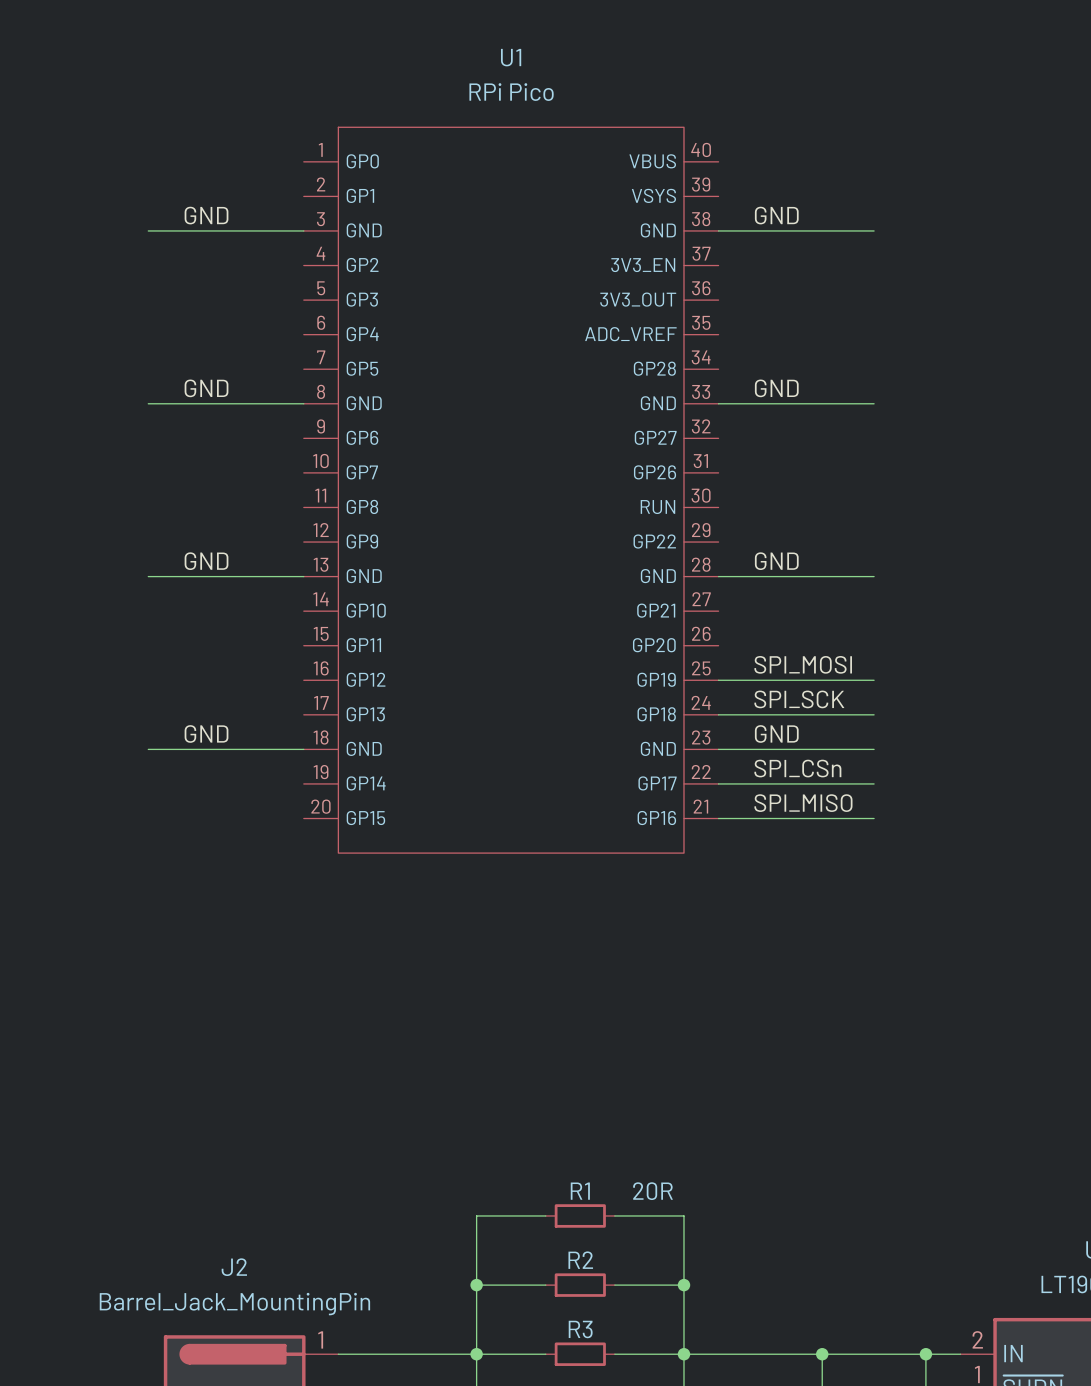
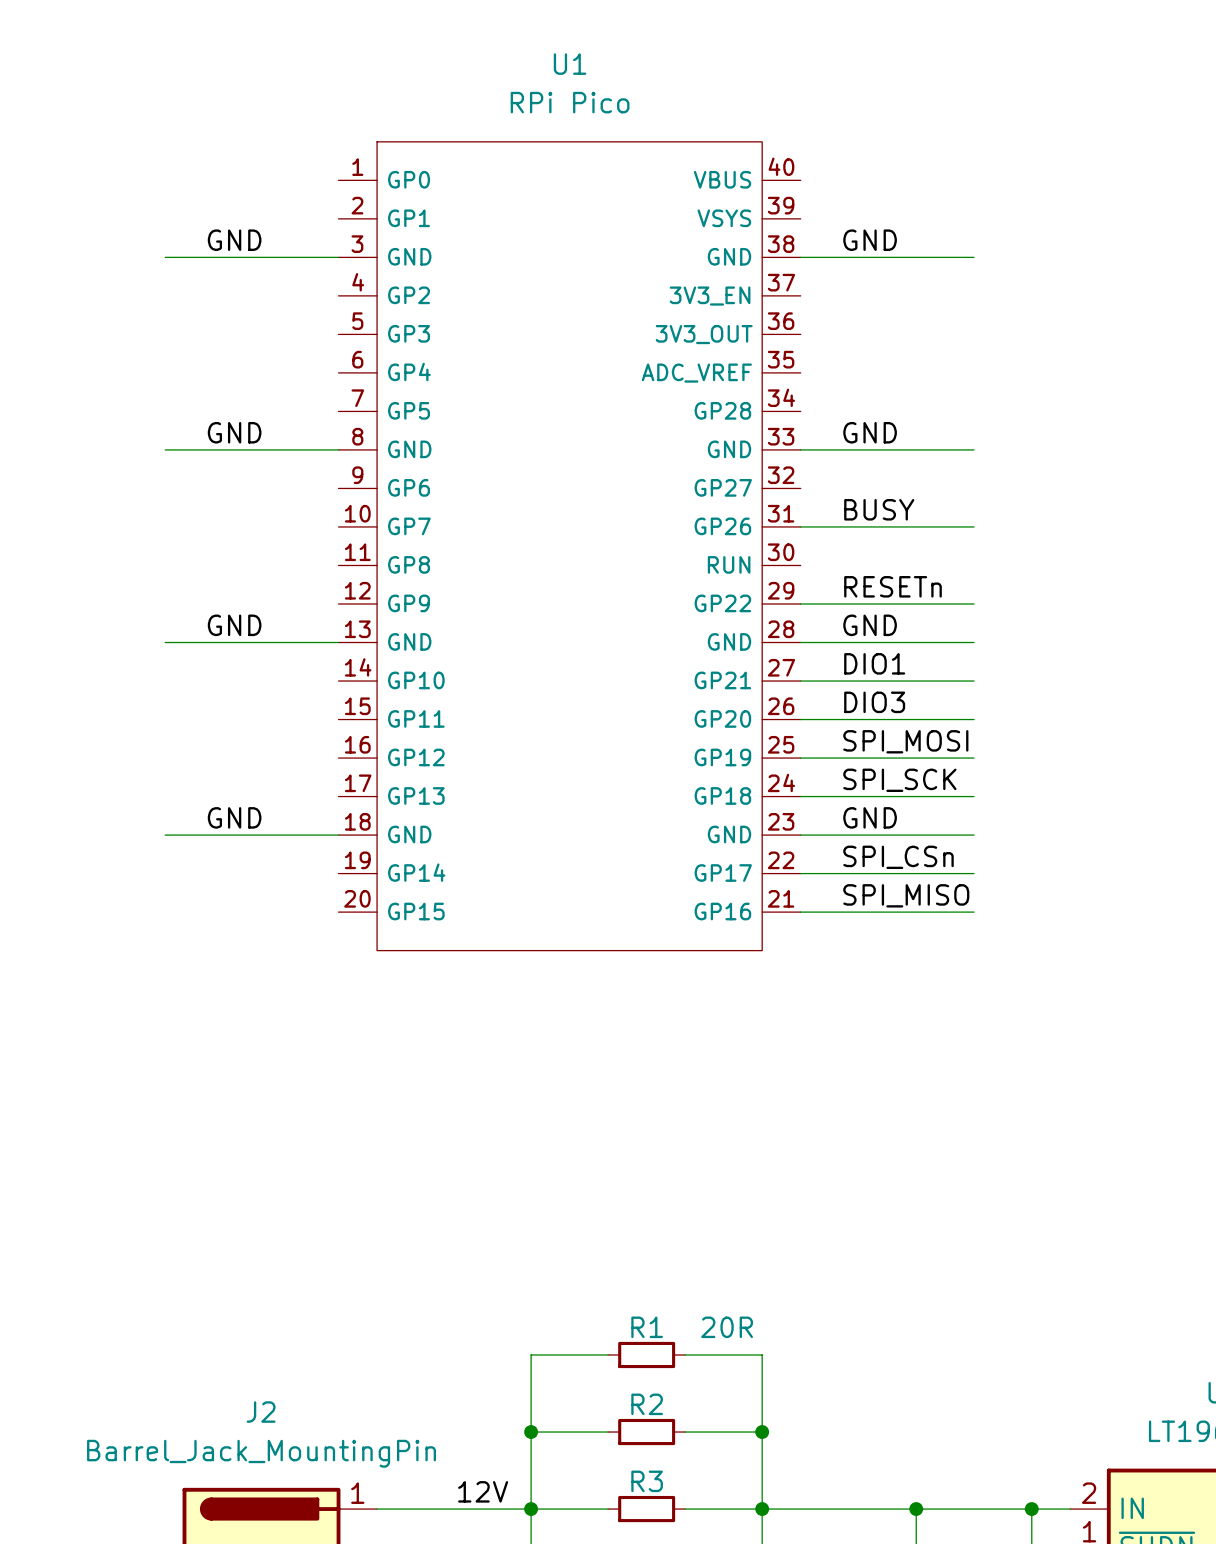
label: none -> BUSY (879, 509)
wire: none -> (800, 526) (974, 526)
label: none -> RESETn (893, 586)
wire: none -> (800, 603) (974, 603)
label: none -> DIO1 (874, 663)
wire: none -> (800, 681) (974, 681)
label: none -> DIO3 (874, 702)
wire: none -> (800, 719) (974, 719)
label: none -> 12V (483, 1491)

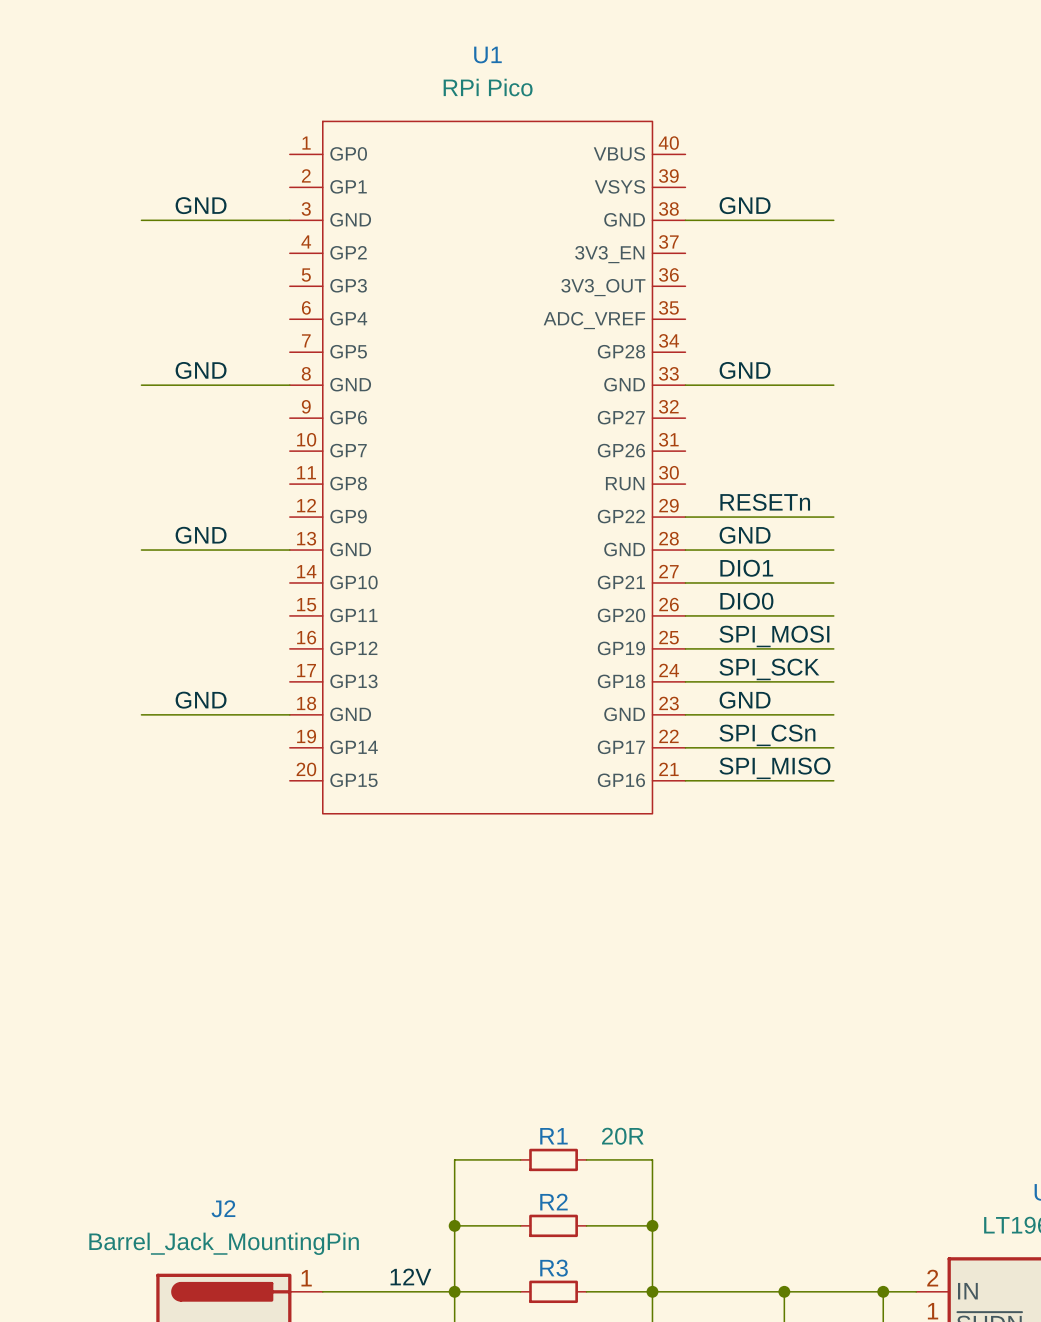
label: BUSY (879, 509) -> none
wire: (800, 526) (974, 526) -> none
label: DIO3 (874, 702) -> DIO0 (746, 601)

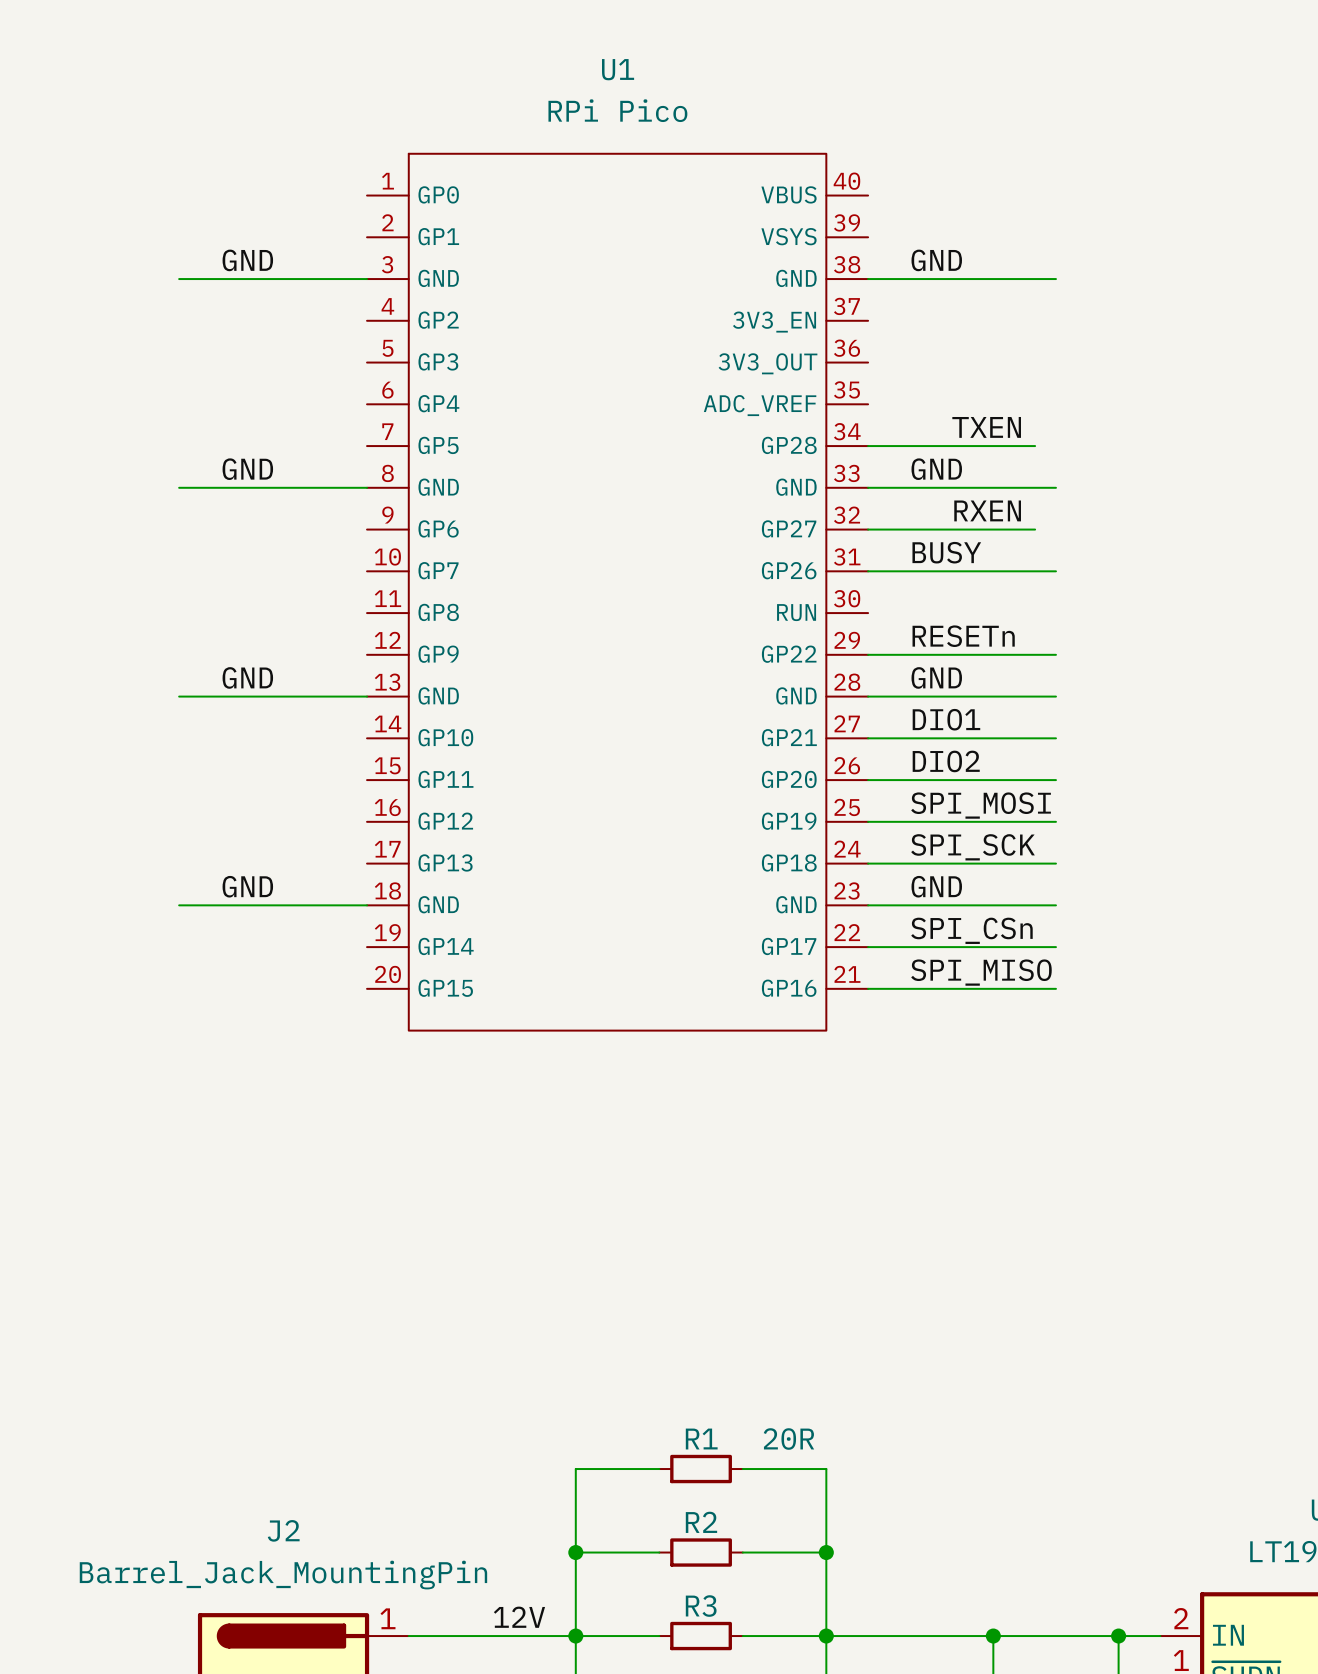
label: none -> TXEN (986, 427)
wire: none -> (868, 446) (1035, 446)
label: none -> RXEN (987, 510)
wire: none -> (868, 529) (1035, 529)
label: none -> BUSY (946, 552)
wire: none -> (868, 571) (1055, 571)
label: DIO0 (746, 601) -> DIO2 (946, 761)

